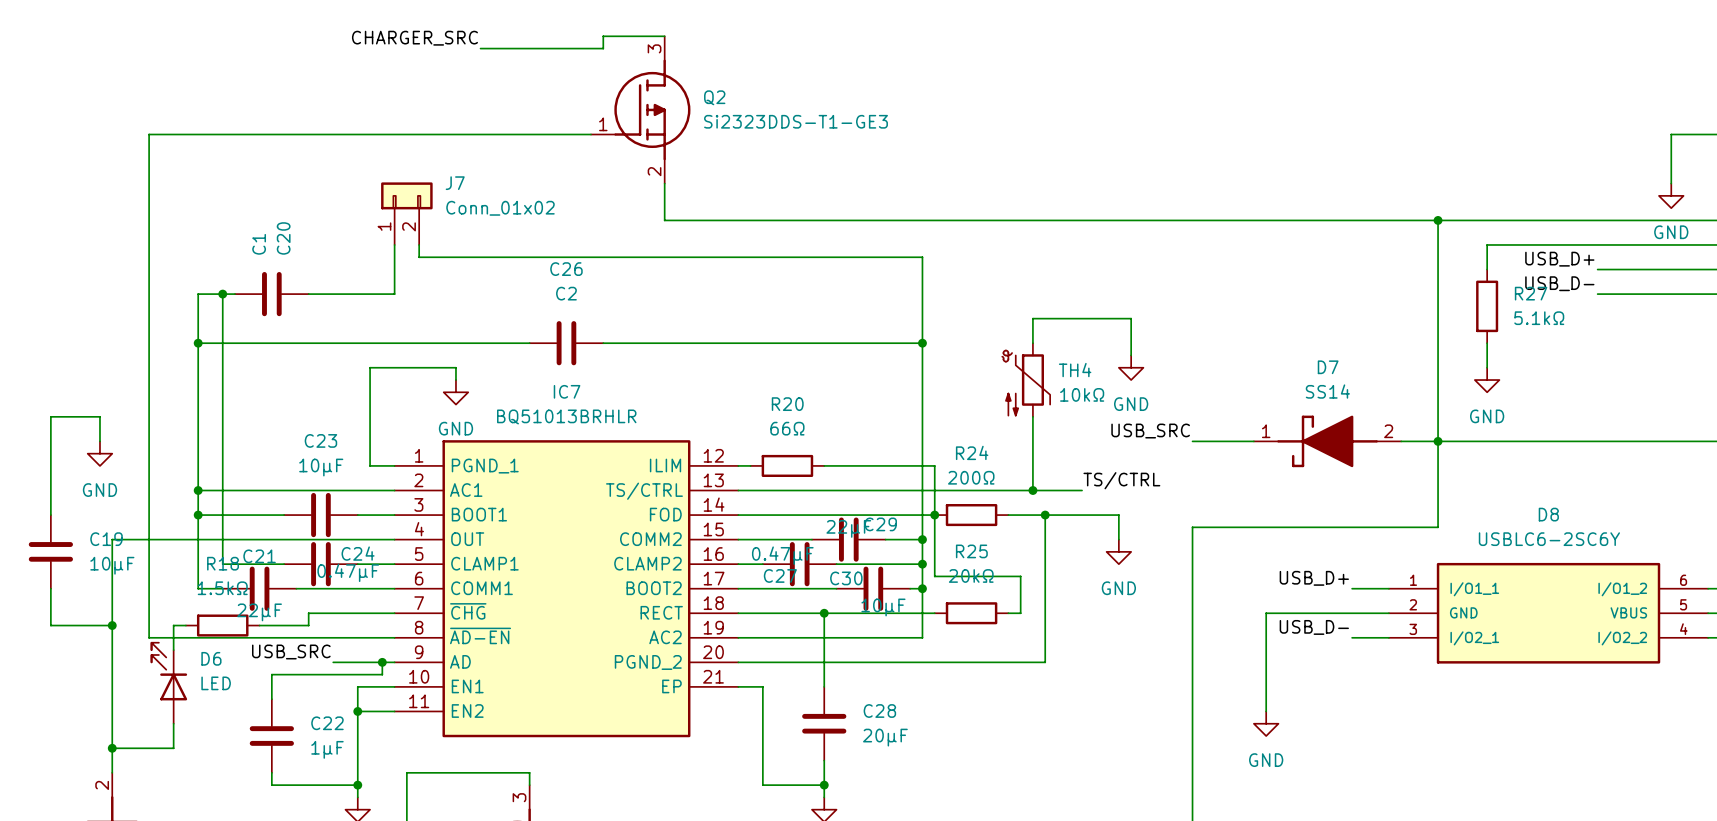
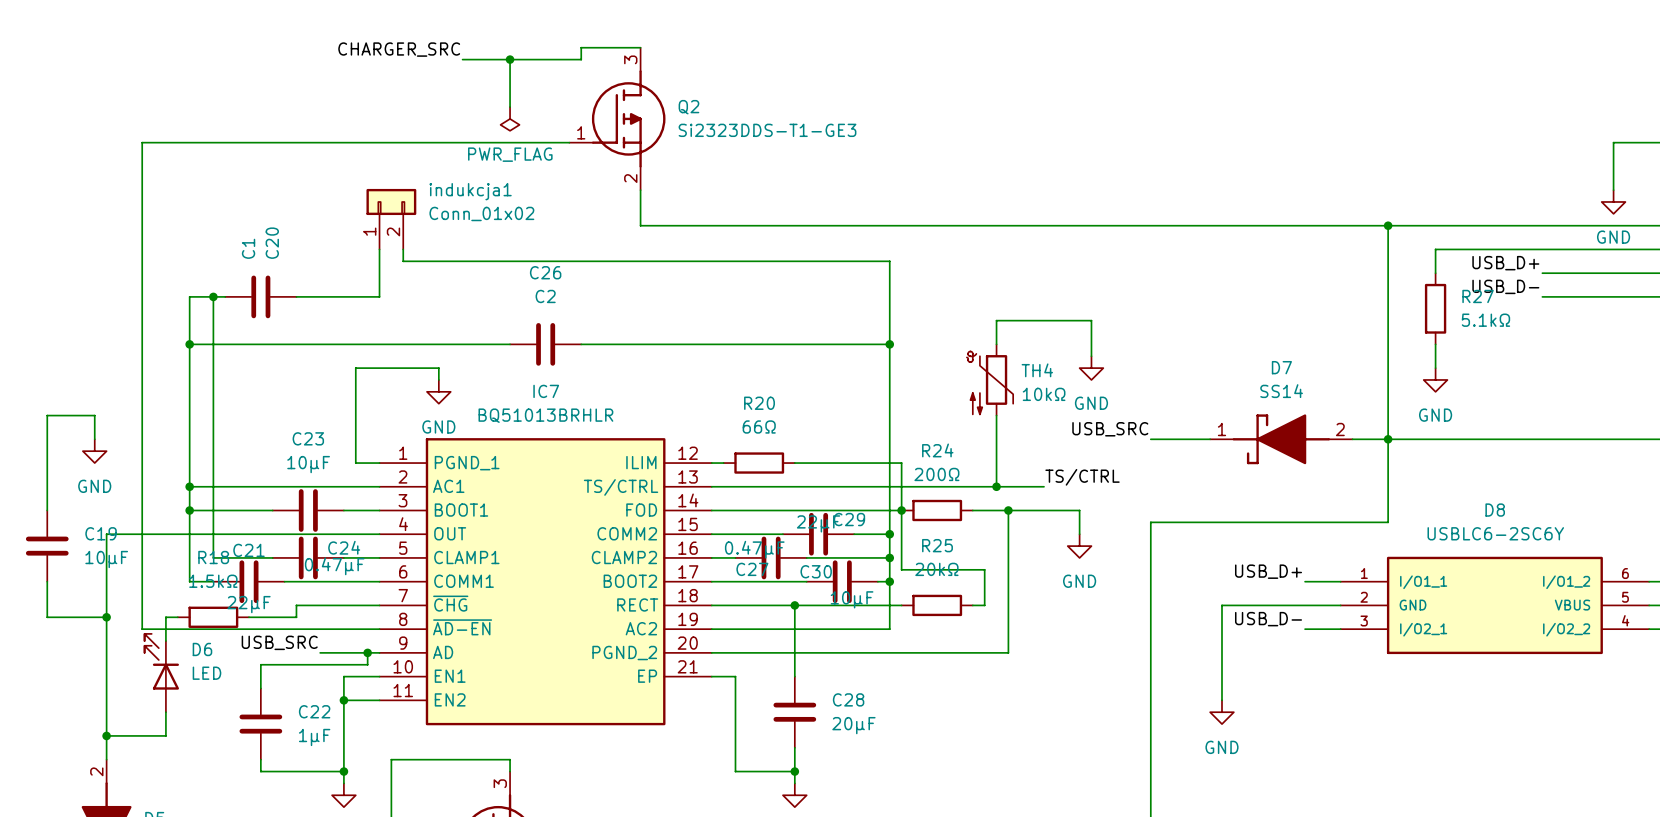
wire: none -> (510, 59) (510, 107)
junction: none -> (510, 59)
power symbol: none -> PWR_FLAG (510, 118)
J7 name: J7 (455, 183) -> indukcja1 (470, 191)

